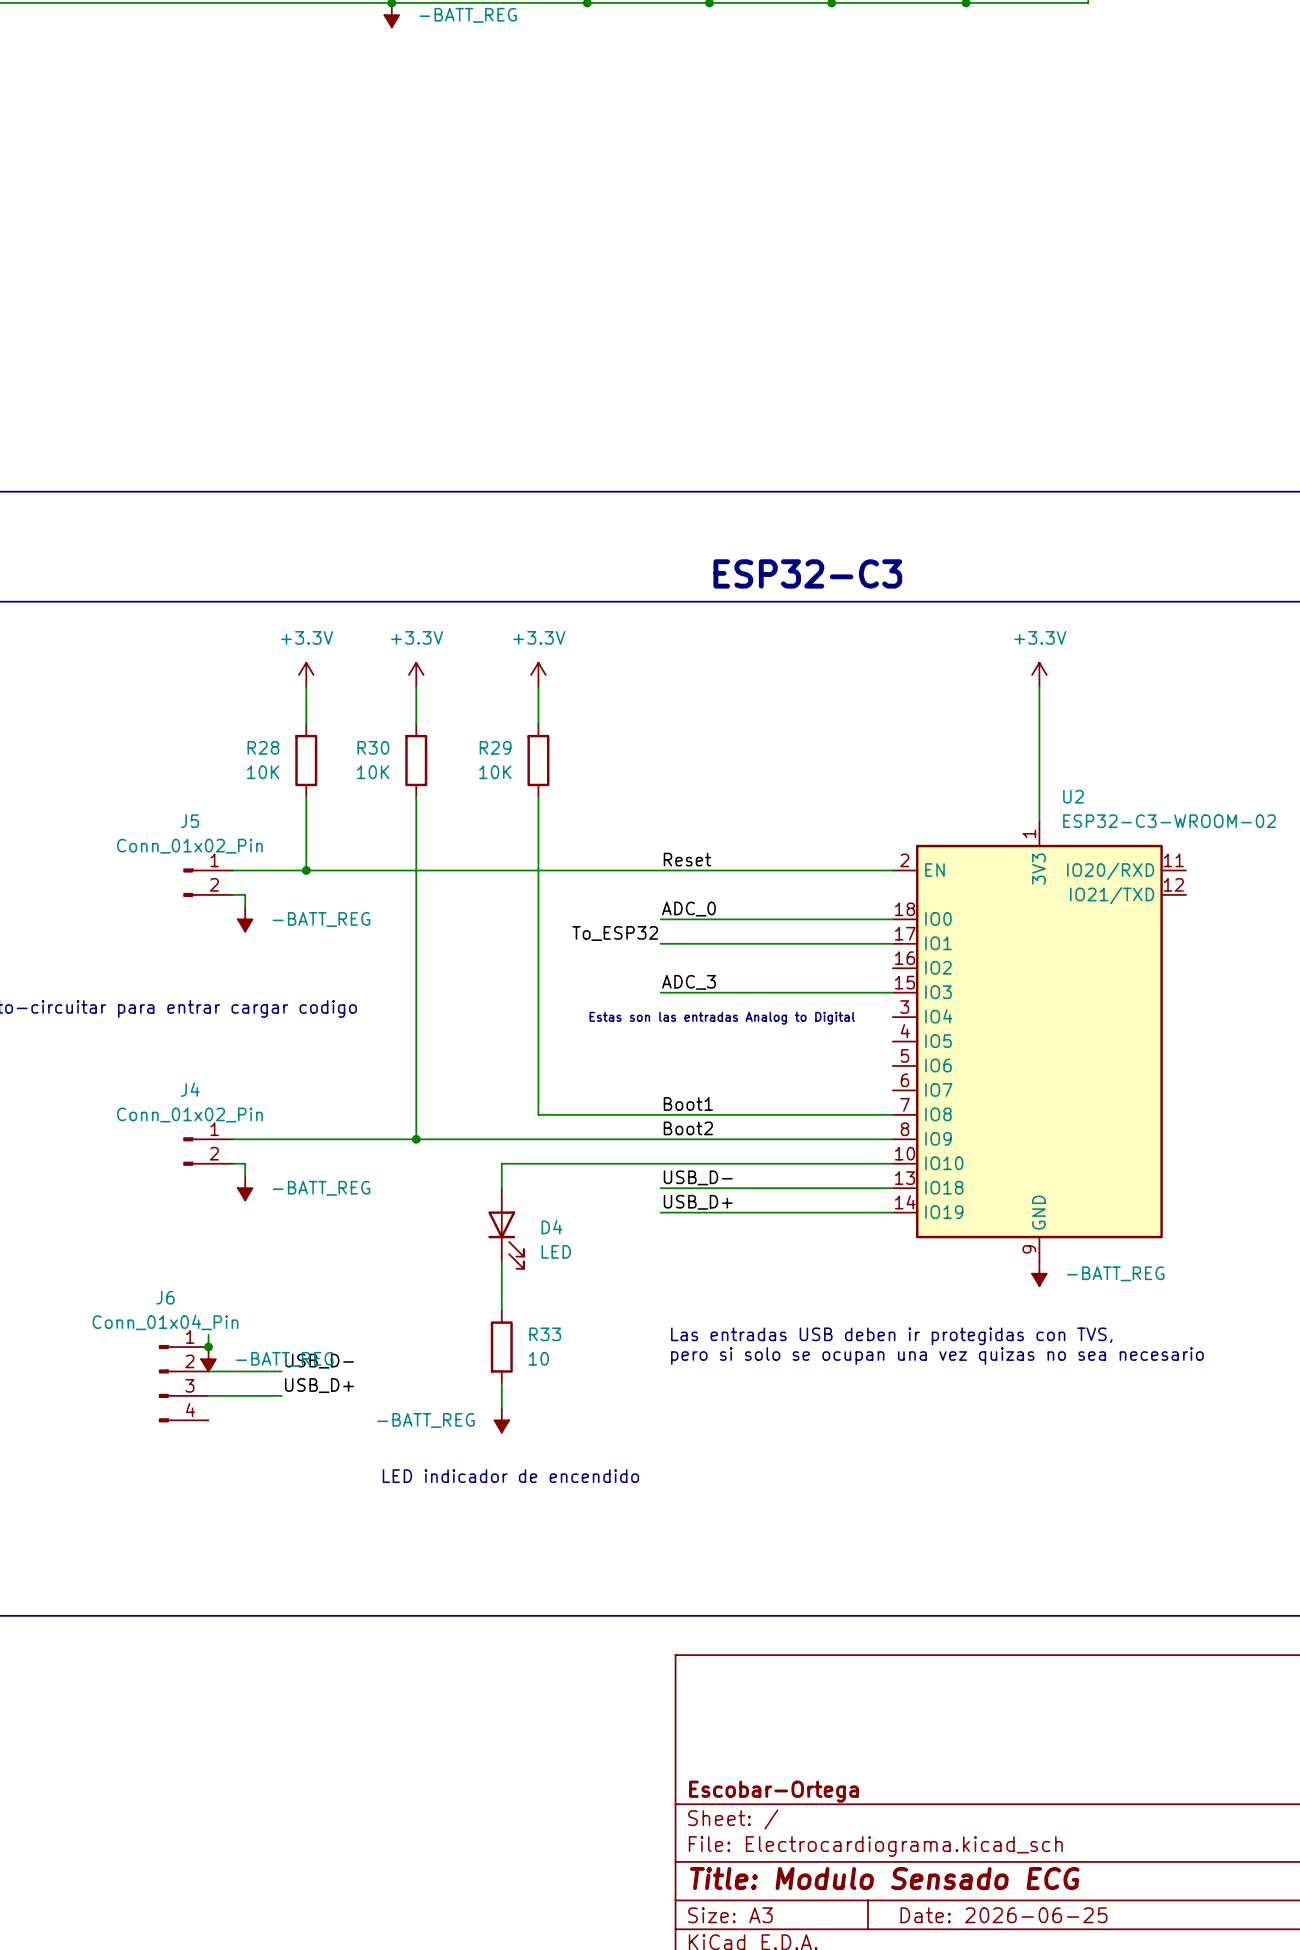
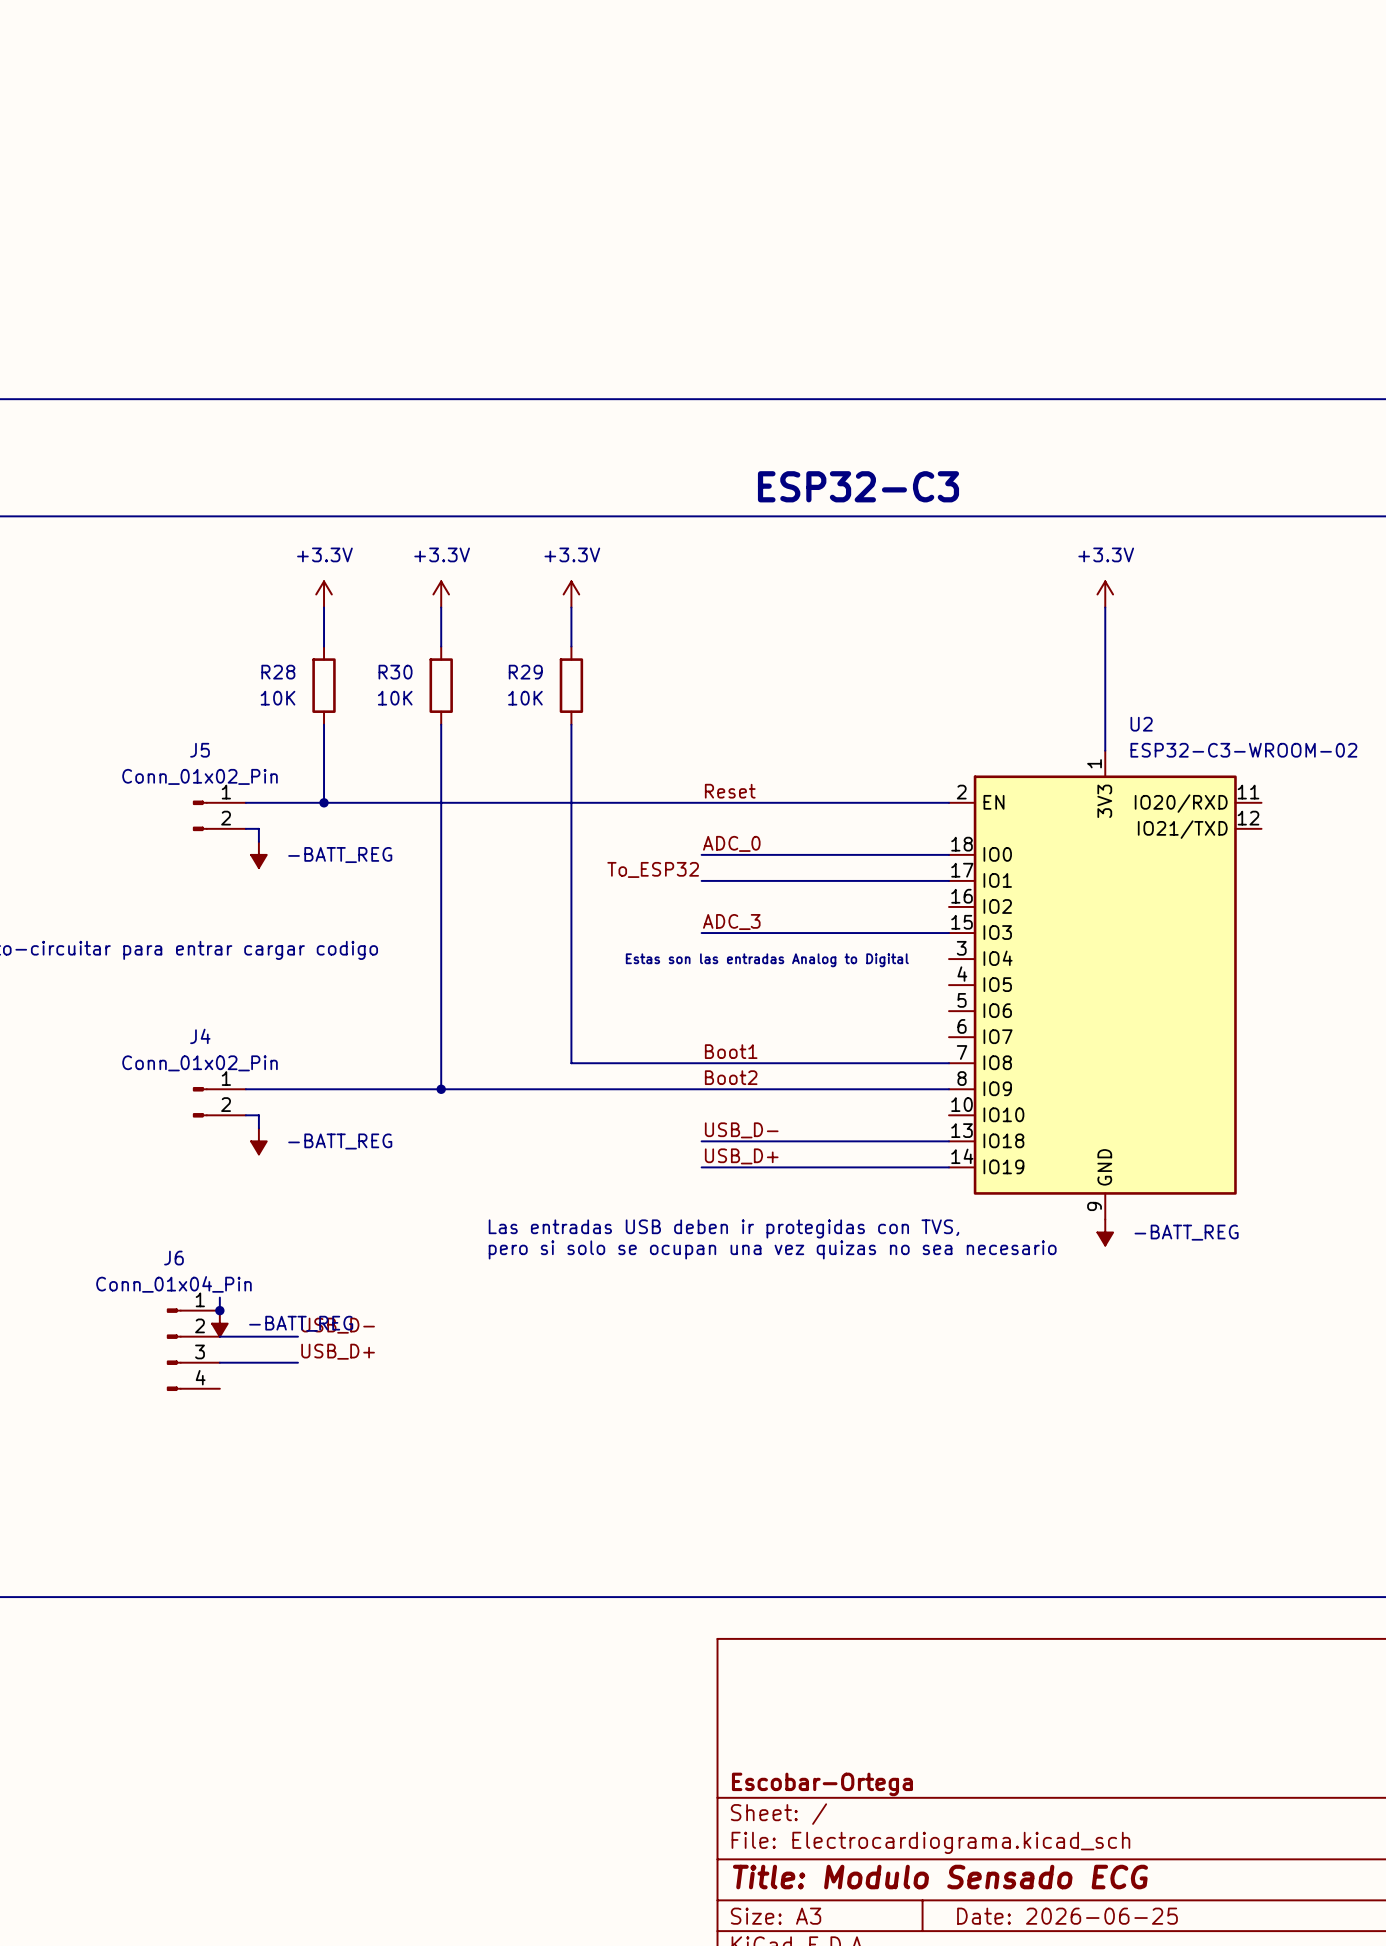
wire: (892, 1163) (501, 1163) (501, 1188) -> none
D4: LED (506, 1228) -> none
wire: (501, 1261) (501, 1310) -> none
text position: Las entradas USB deben ir protegidas con TVS, (891, 1336) -> Las entradas USB deben ir protegidas con TVS, (723, 1228)
R33: 10 (501, 1347) -> none
text position: pero si solo se ocupan una vez quizas no sea necesario (937, 1356) -> pero si solo se ocupan una vez quizas no sea necesario (772, 1249)
wire: (501, 1383) (501, 1408) -> none
power symbol: -BATT_REG (501, 1420) -> none
text: LED indicador de encendido (510, 1476) -> none

